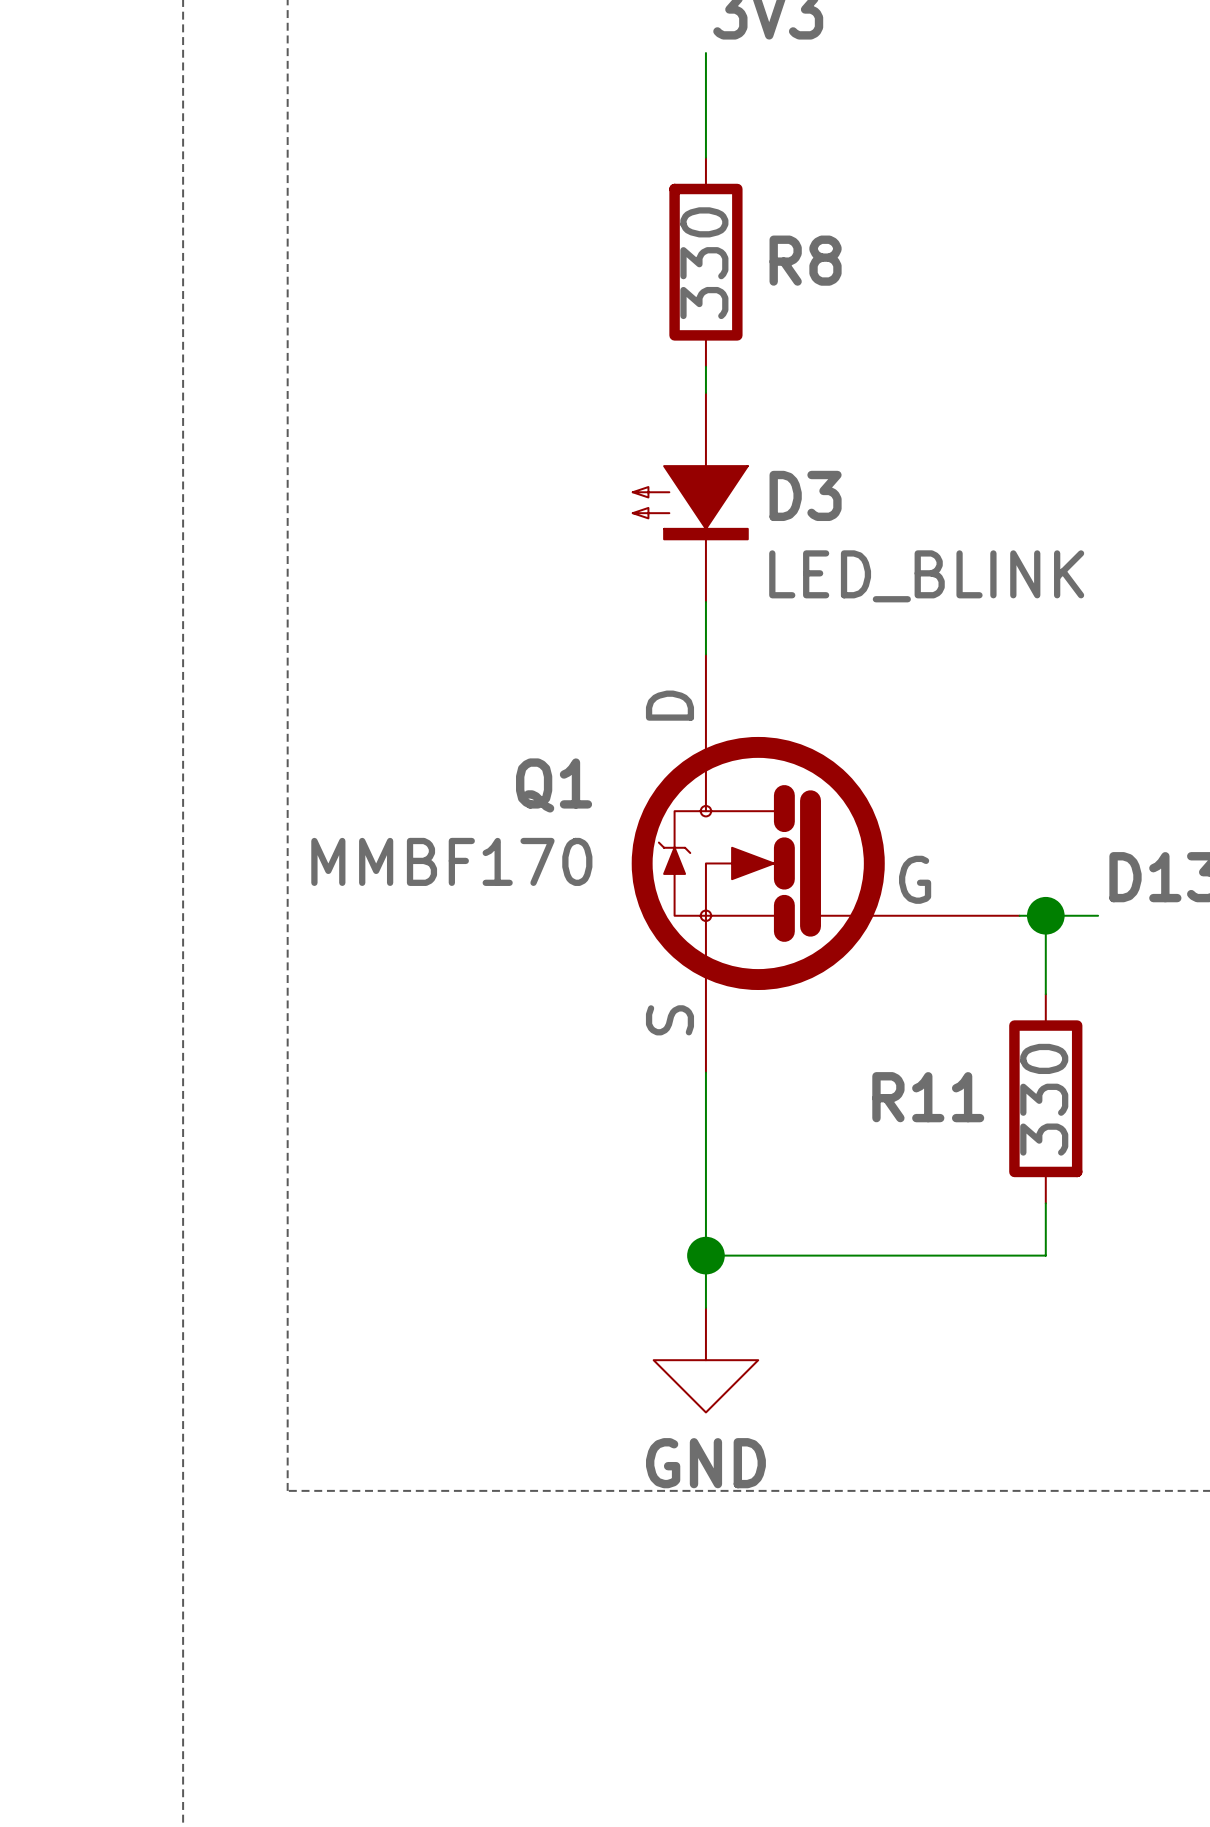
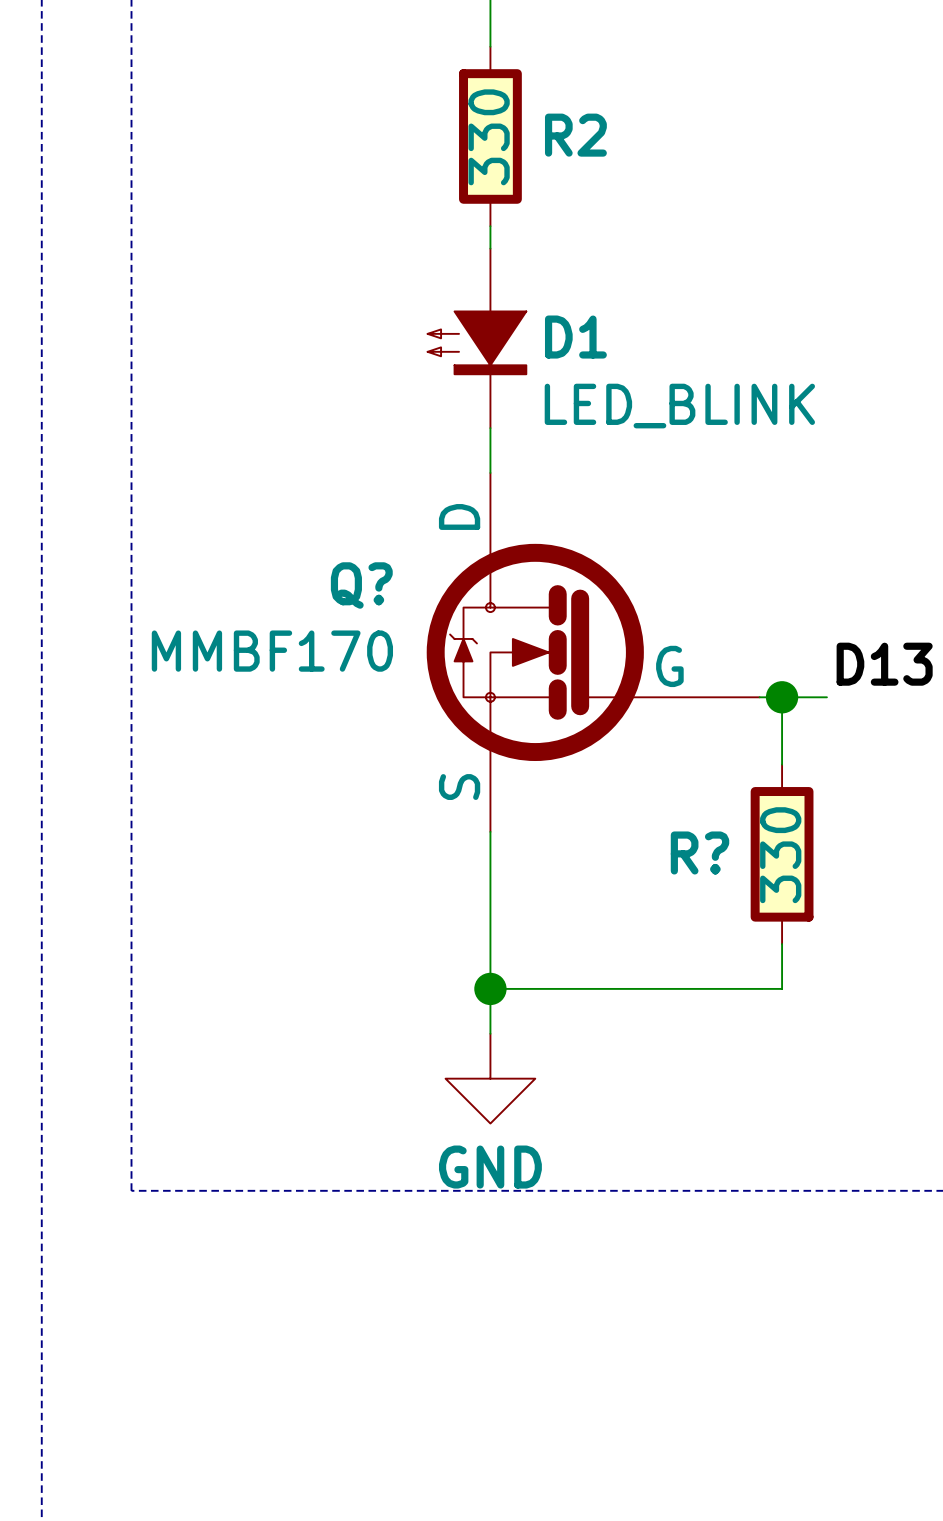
R8 name: R8 (805, 260) -> R2 (575, 135)
D3 name: D3 (805, 495) -> D1 (575, 337)
Q1 name: Q1 (554, 785) -> Q? (361, 585)
R11 name: R11 (928, 1097) -> R? (700, 852)

